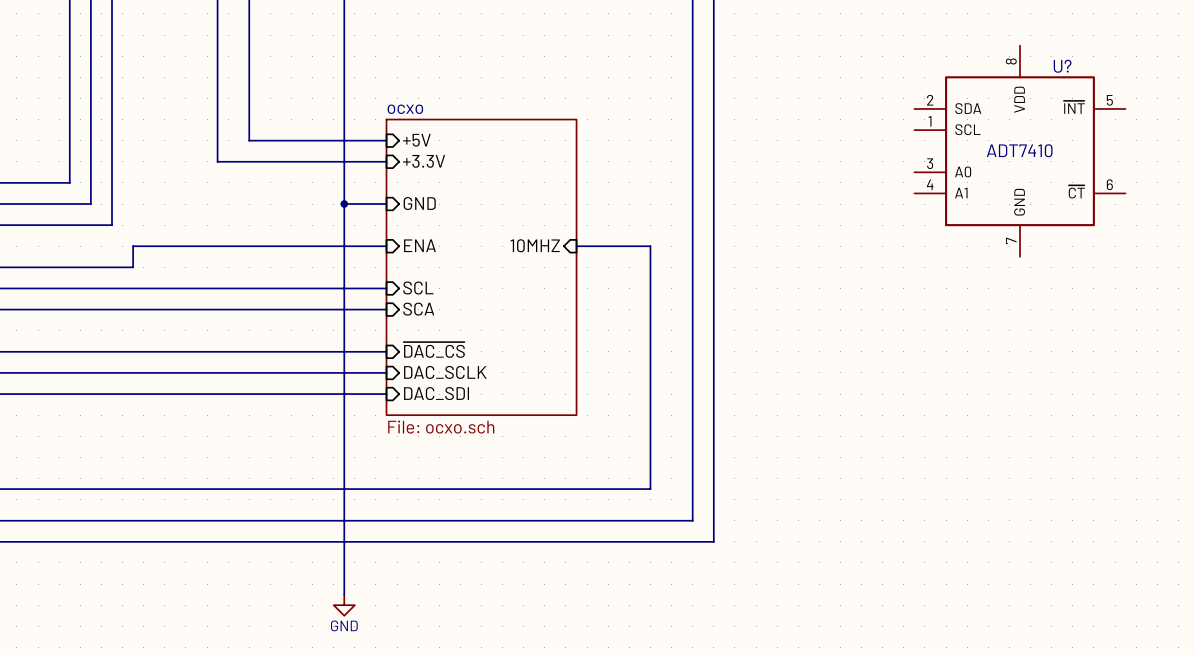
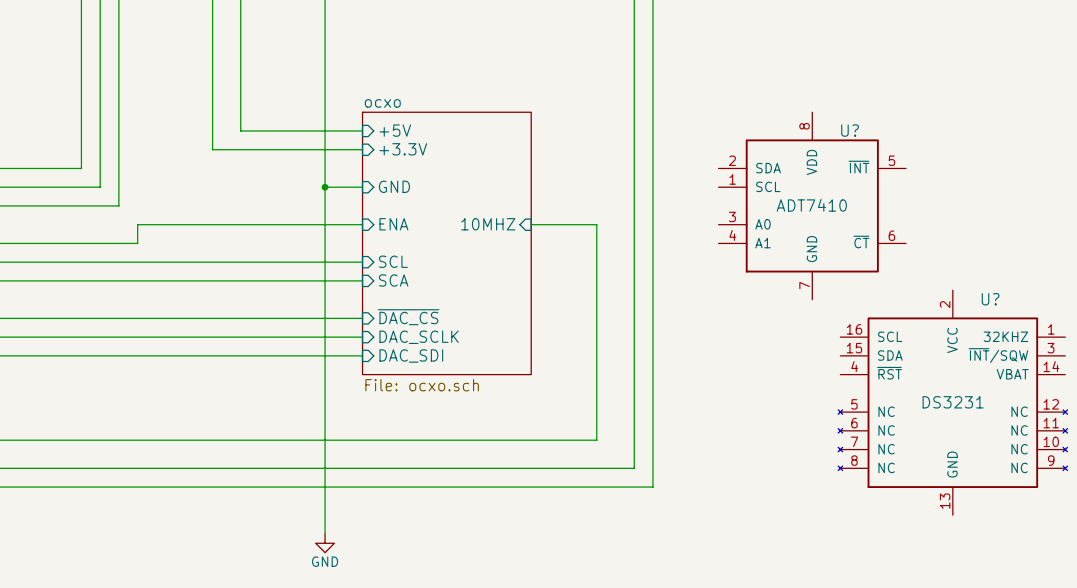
U? position: (1019, 151) -> (812, 205)
U?: none -> DS3231 (952, 402)

